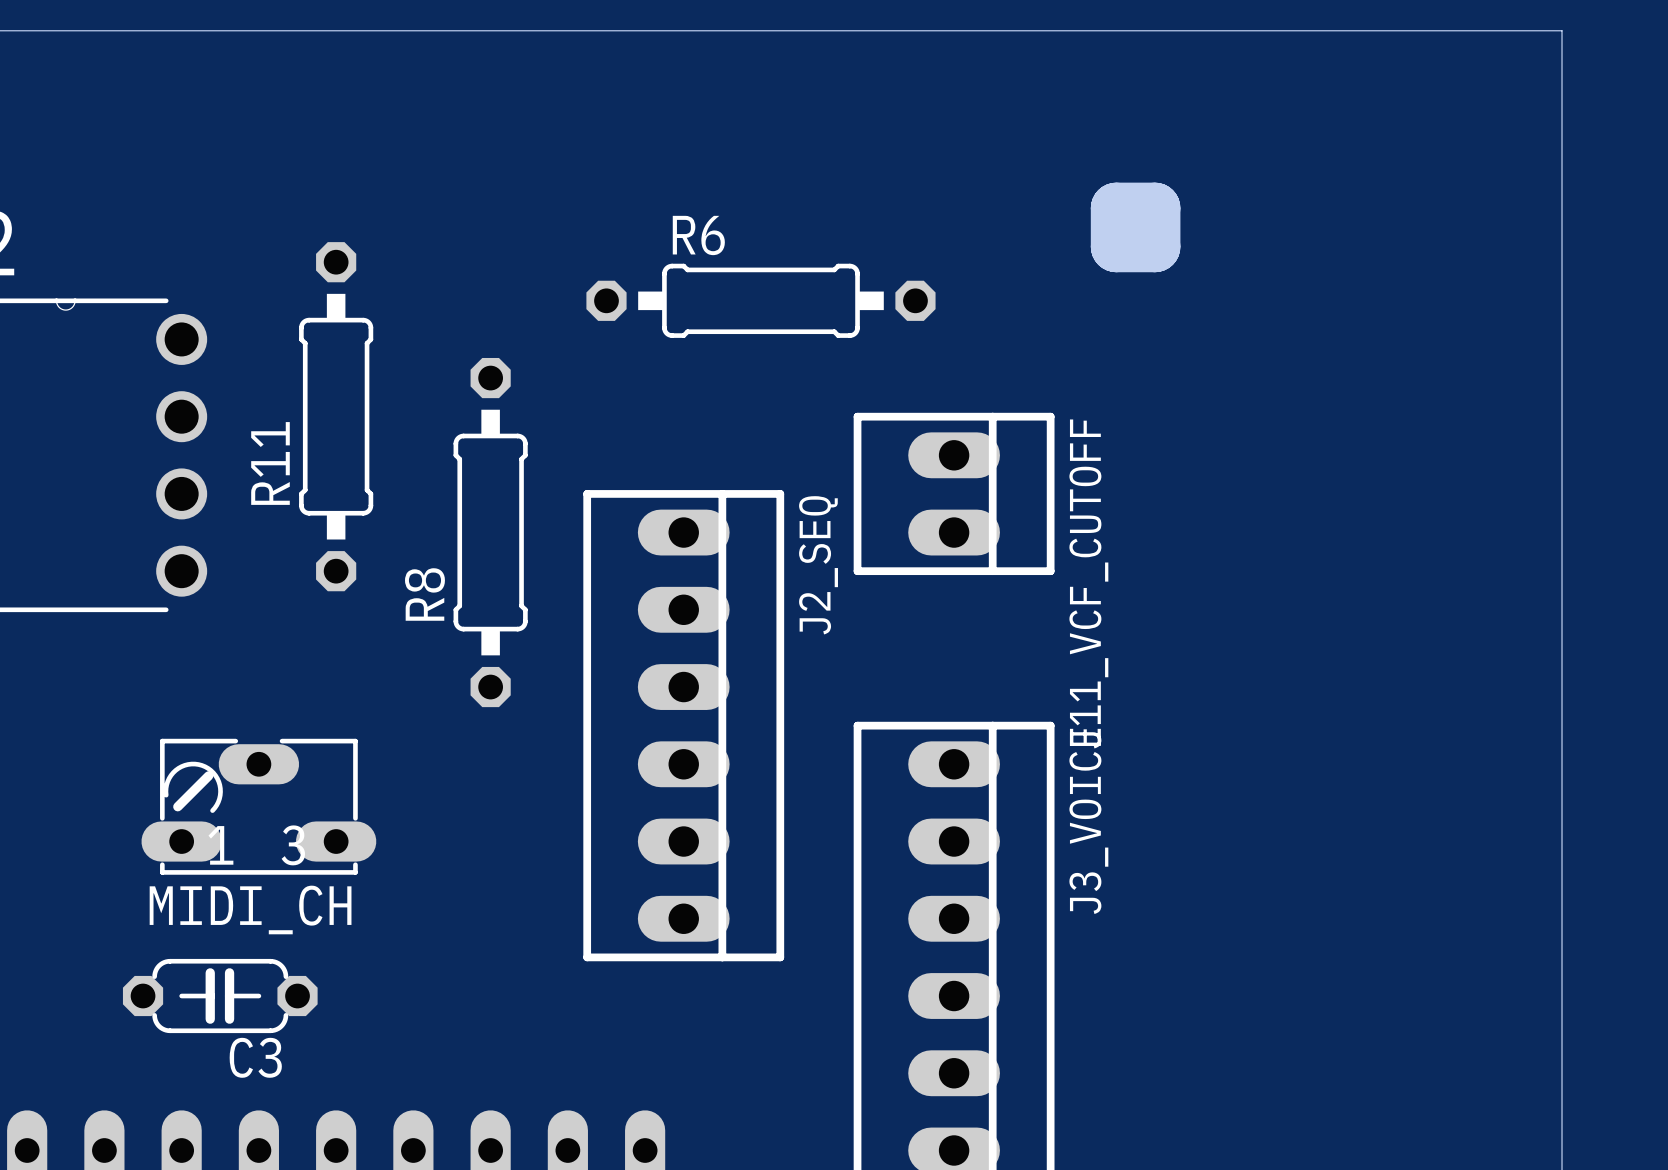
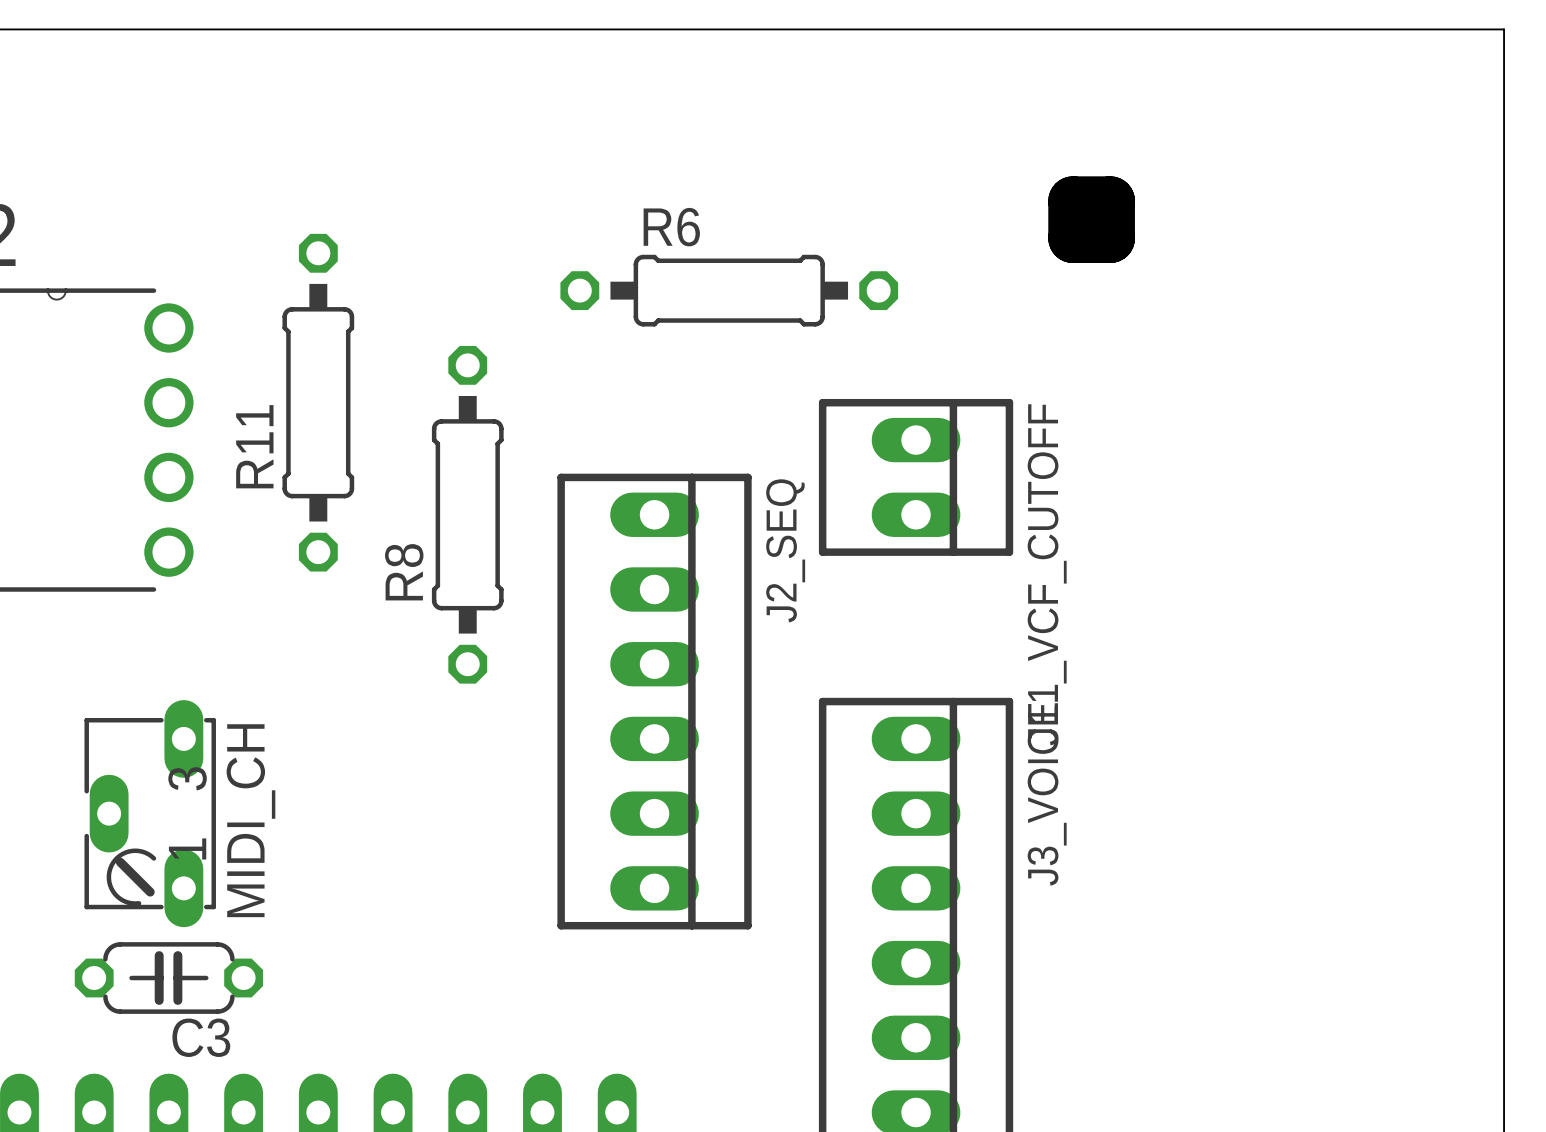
MIDI_CH rotation: 0° (258, 806) -> 90° counterclockwise (150, 813)
C3 position: (220, 996) -> (168, 978)

